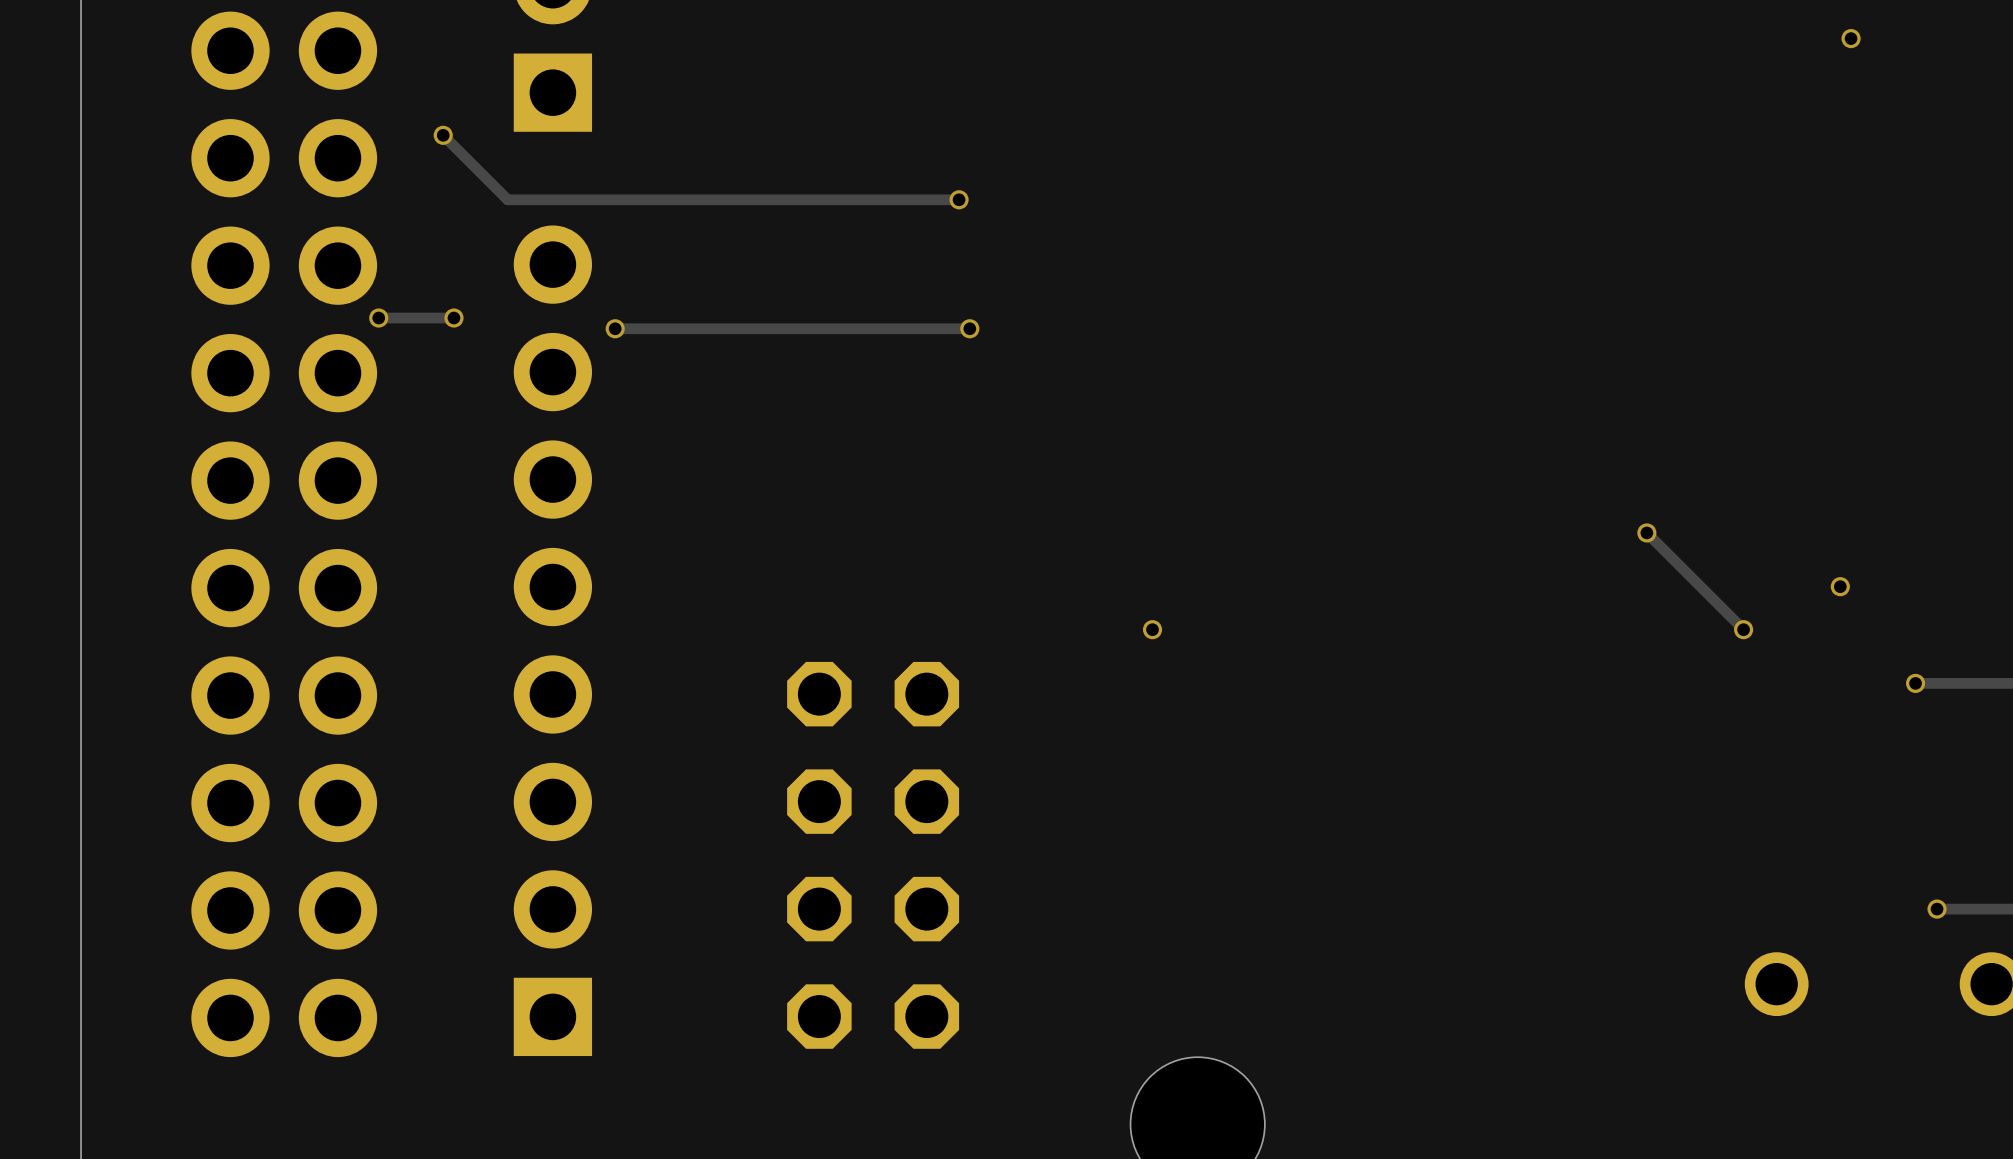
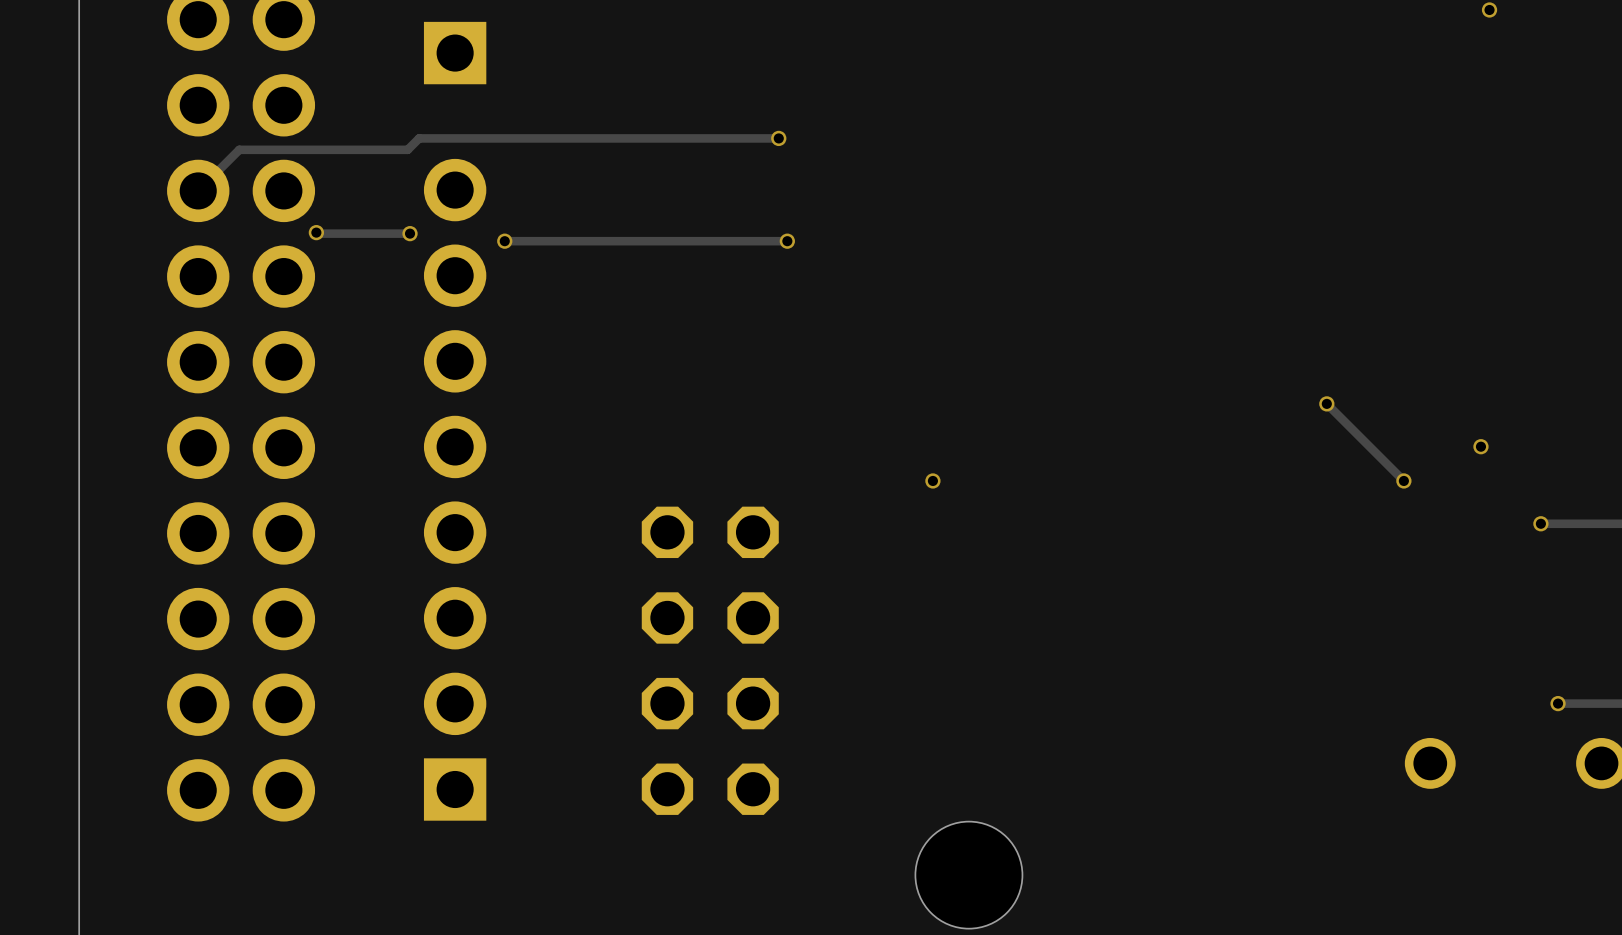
track: (443, 135) (507, 199) -> (198, 190) (239, 149) (407, 149) (419, 138)
via: (443, 135) -> none
track: (453, 318) (378, 318) -> (410, 233) (316, 232)
via position: (453, 318) -> (410, 233)

